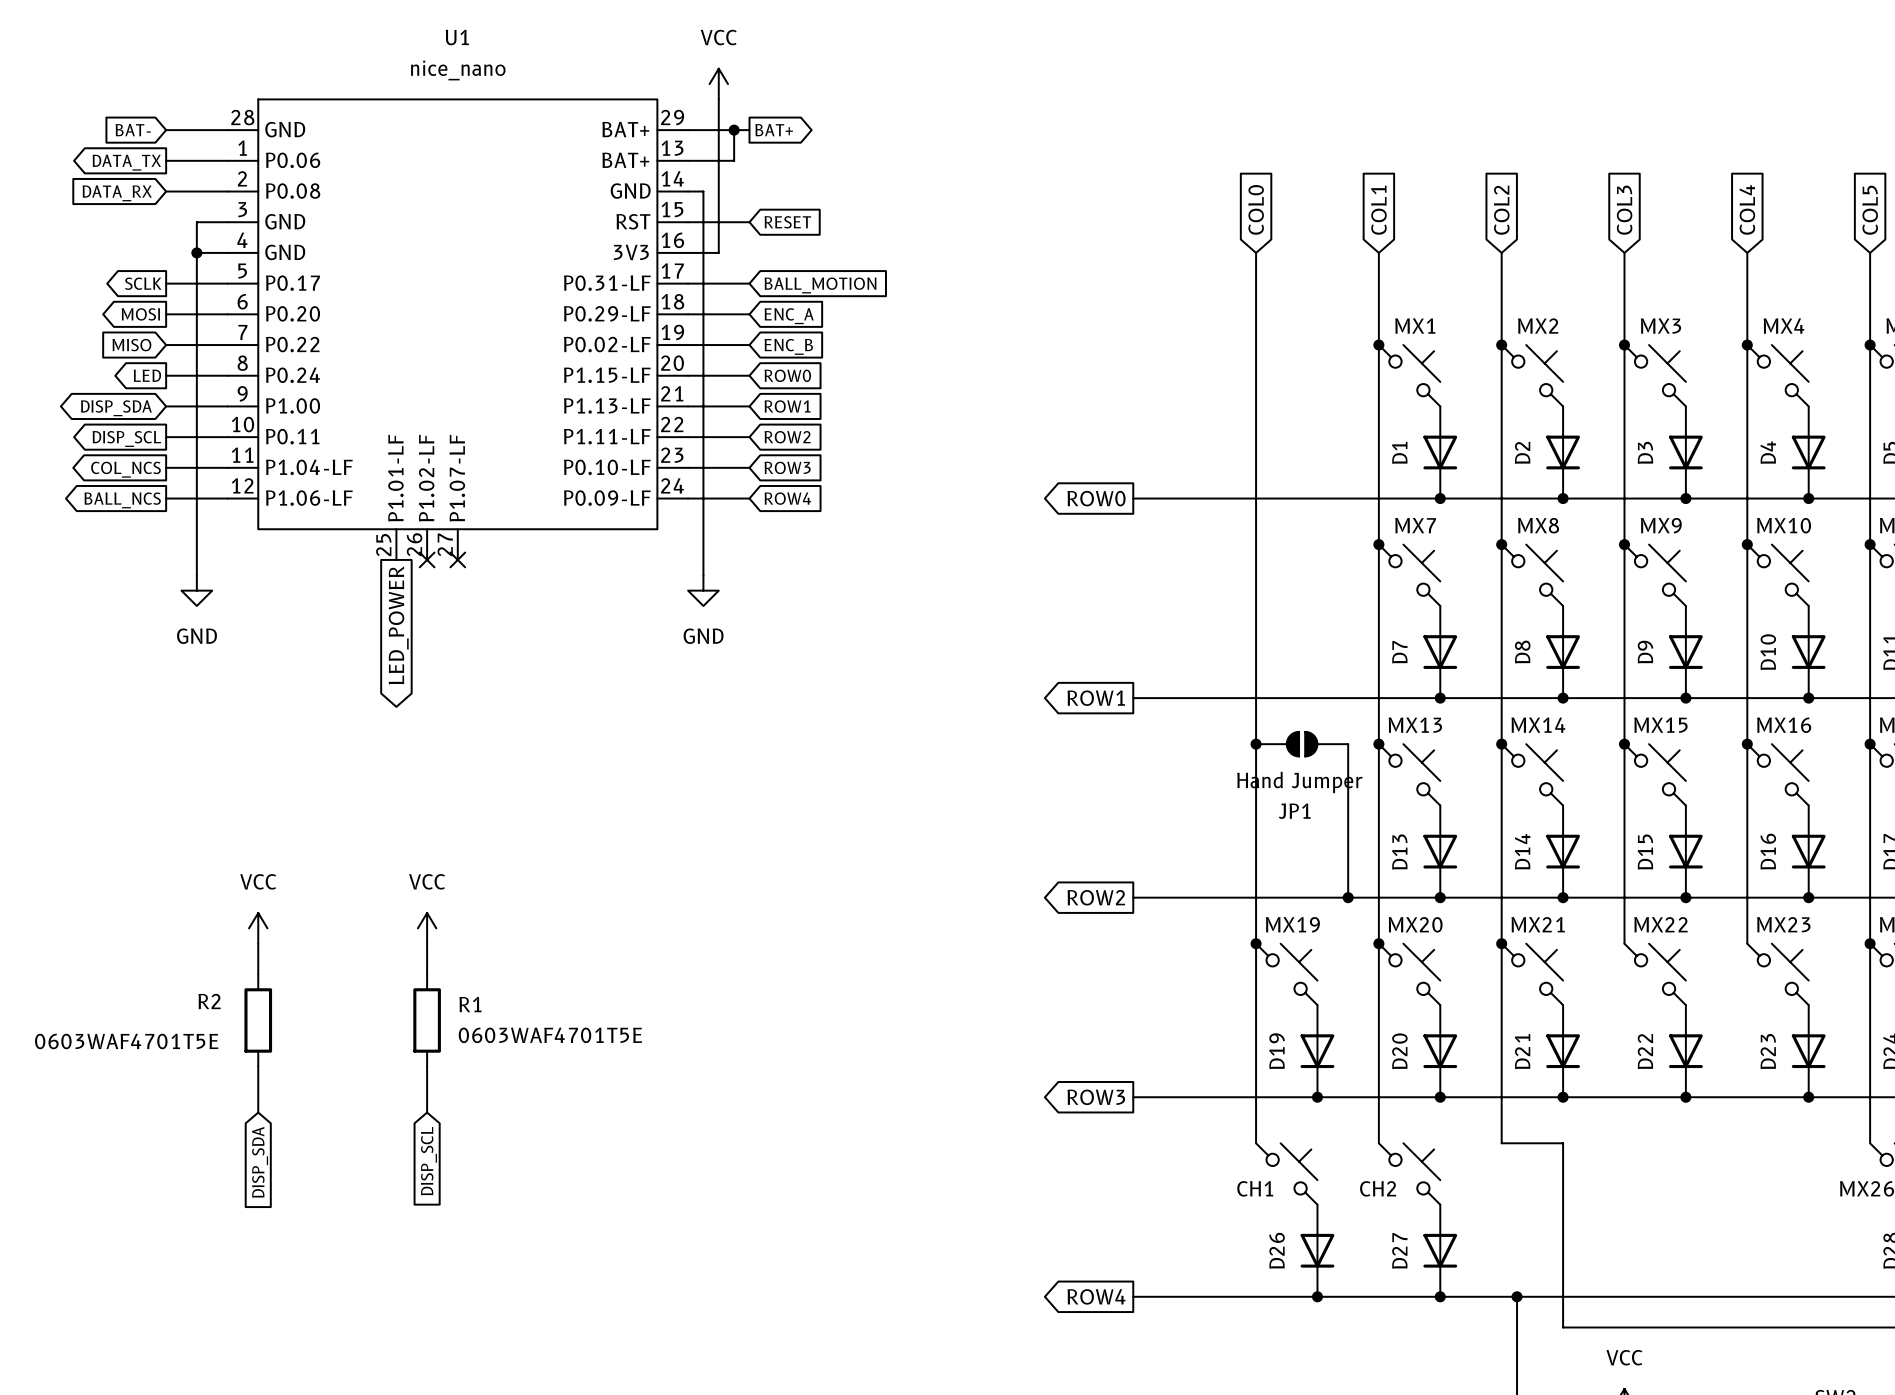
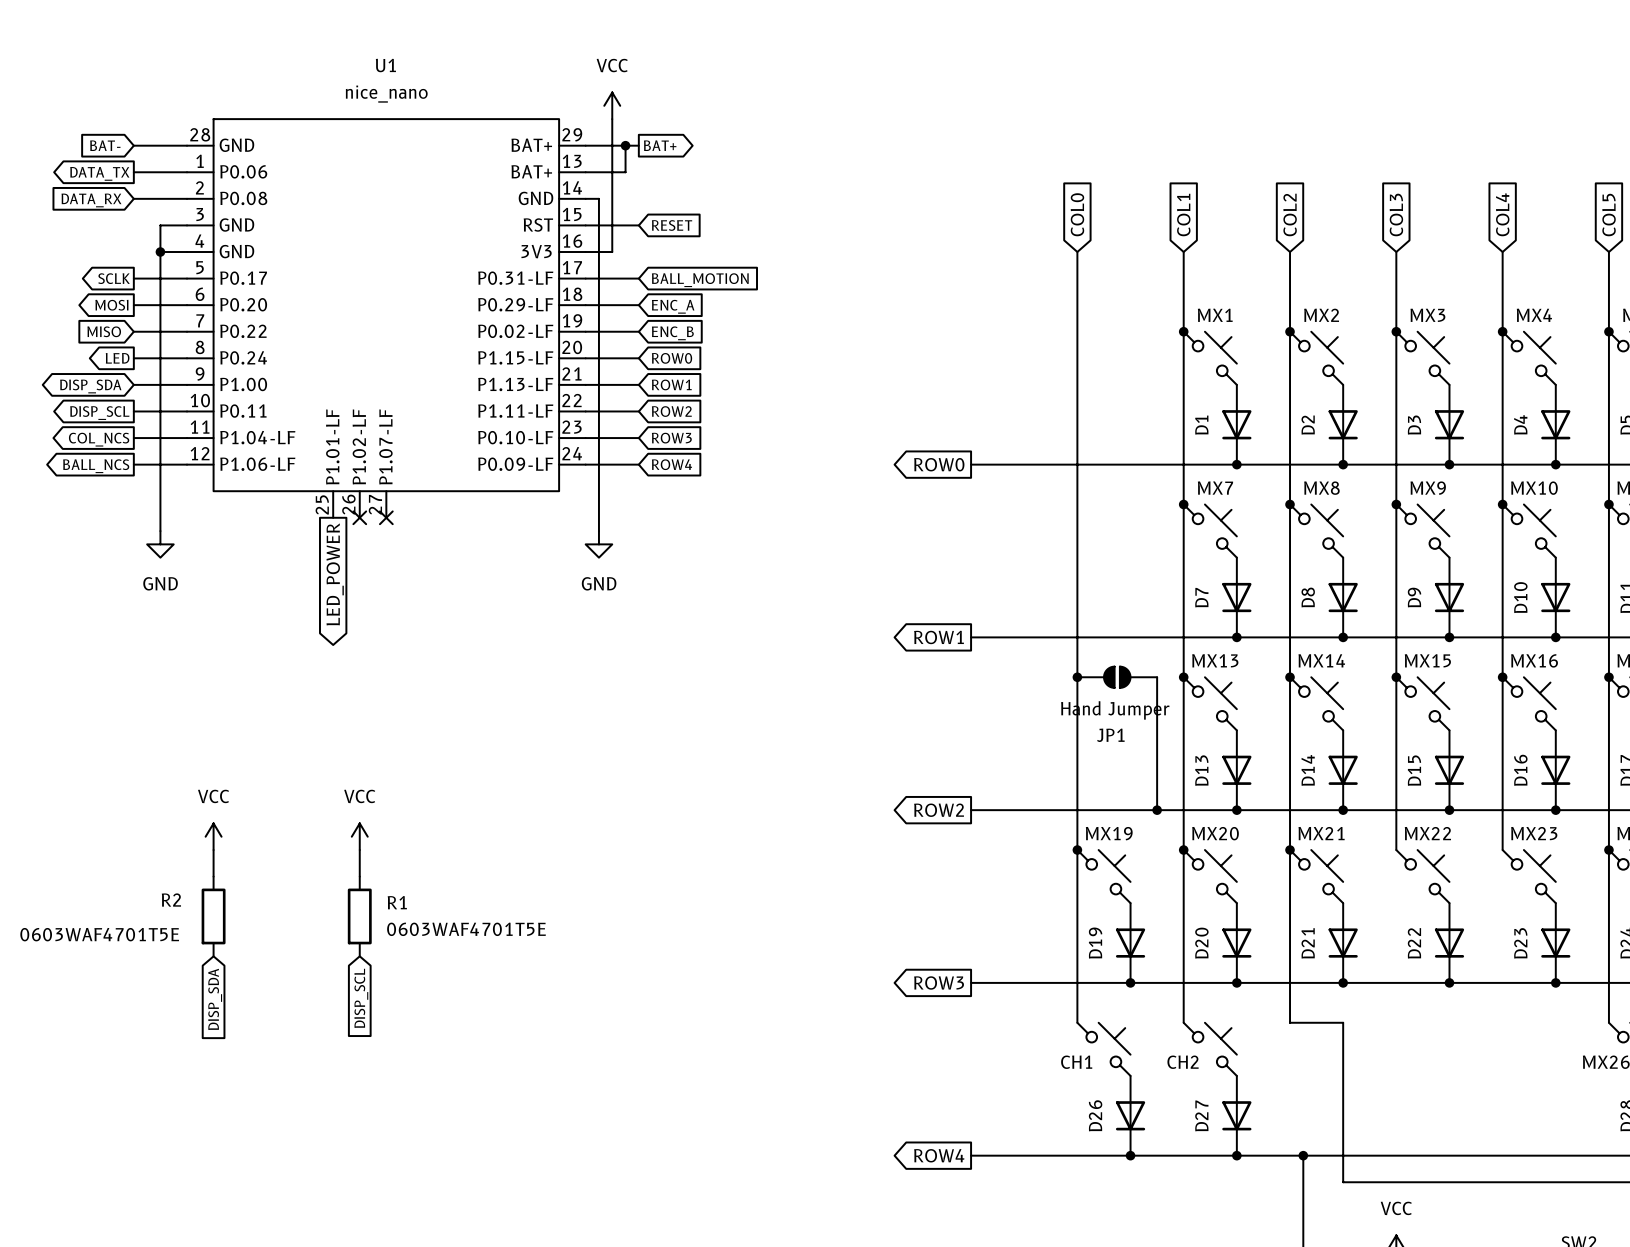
wire: (258, 1066) (258, 1112) -> none
wire: (427, 1066) (427, 1112) -> none
global label position: DISP_SCL (428, 1161) -> DISP_SCL (361, 998)
global label position: DISP_SDA (260, 1162) -> DISP_SDA (215, 999)

